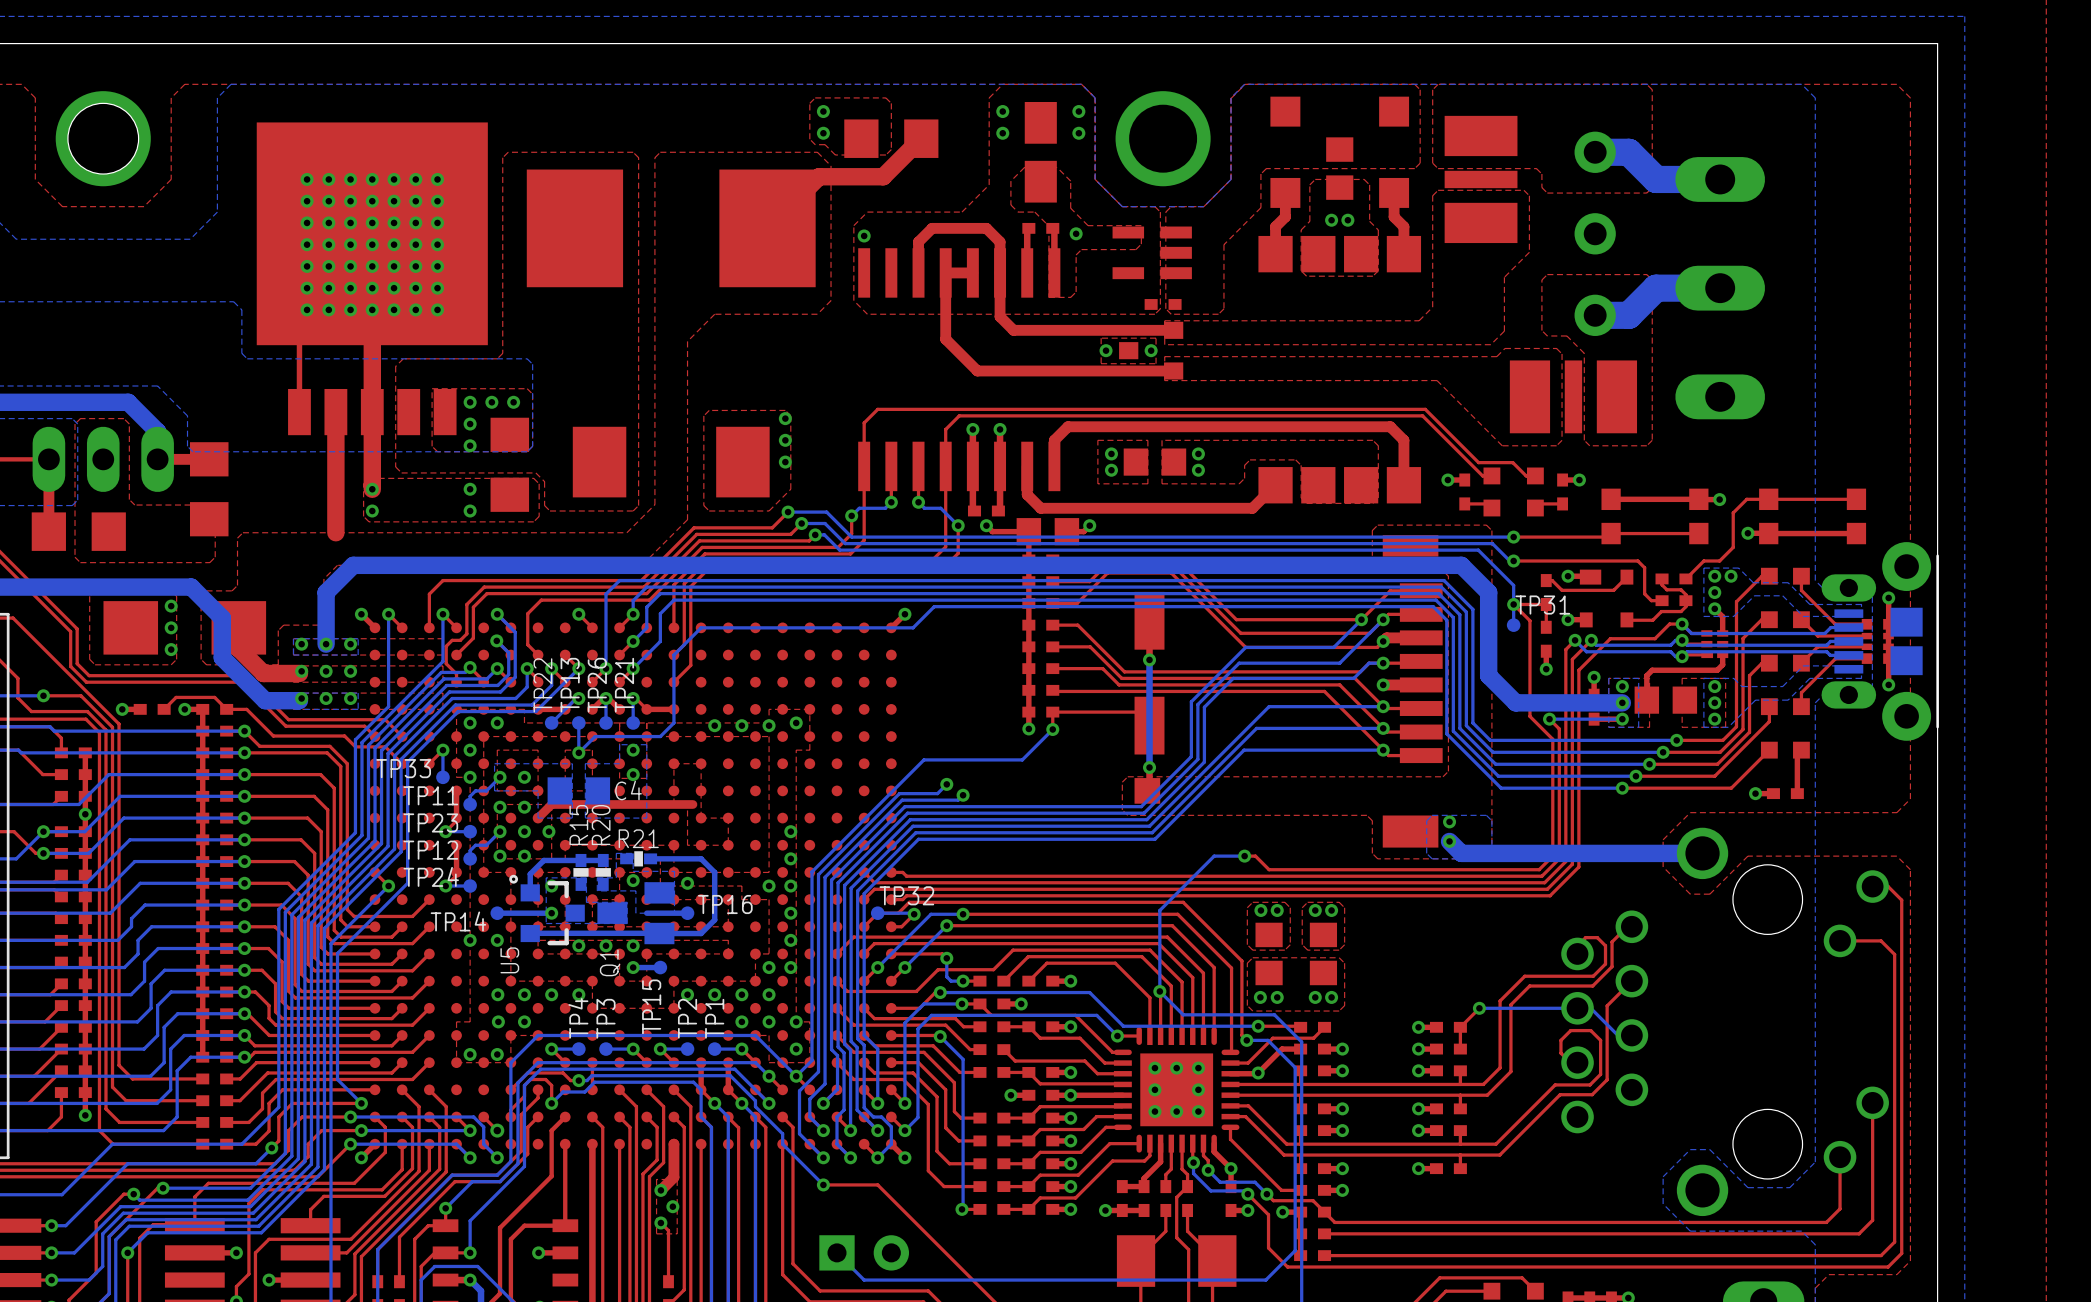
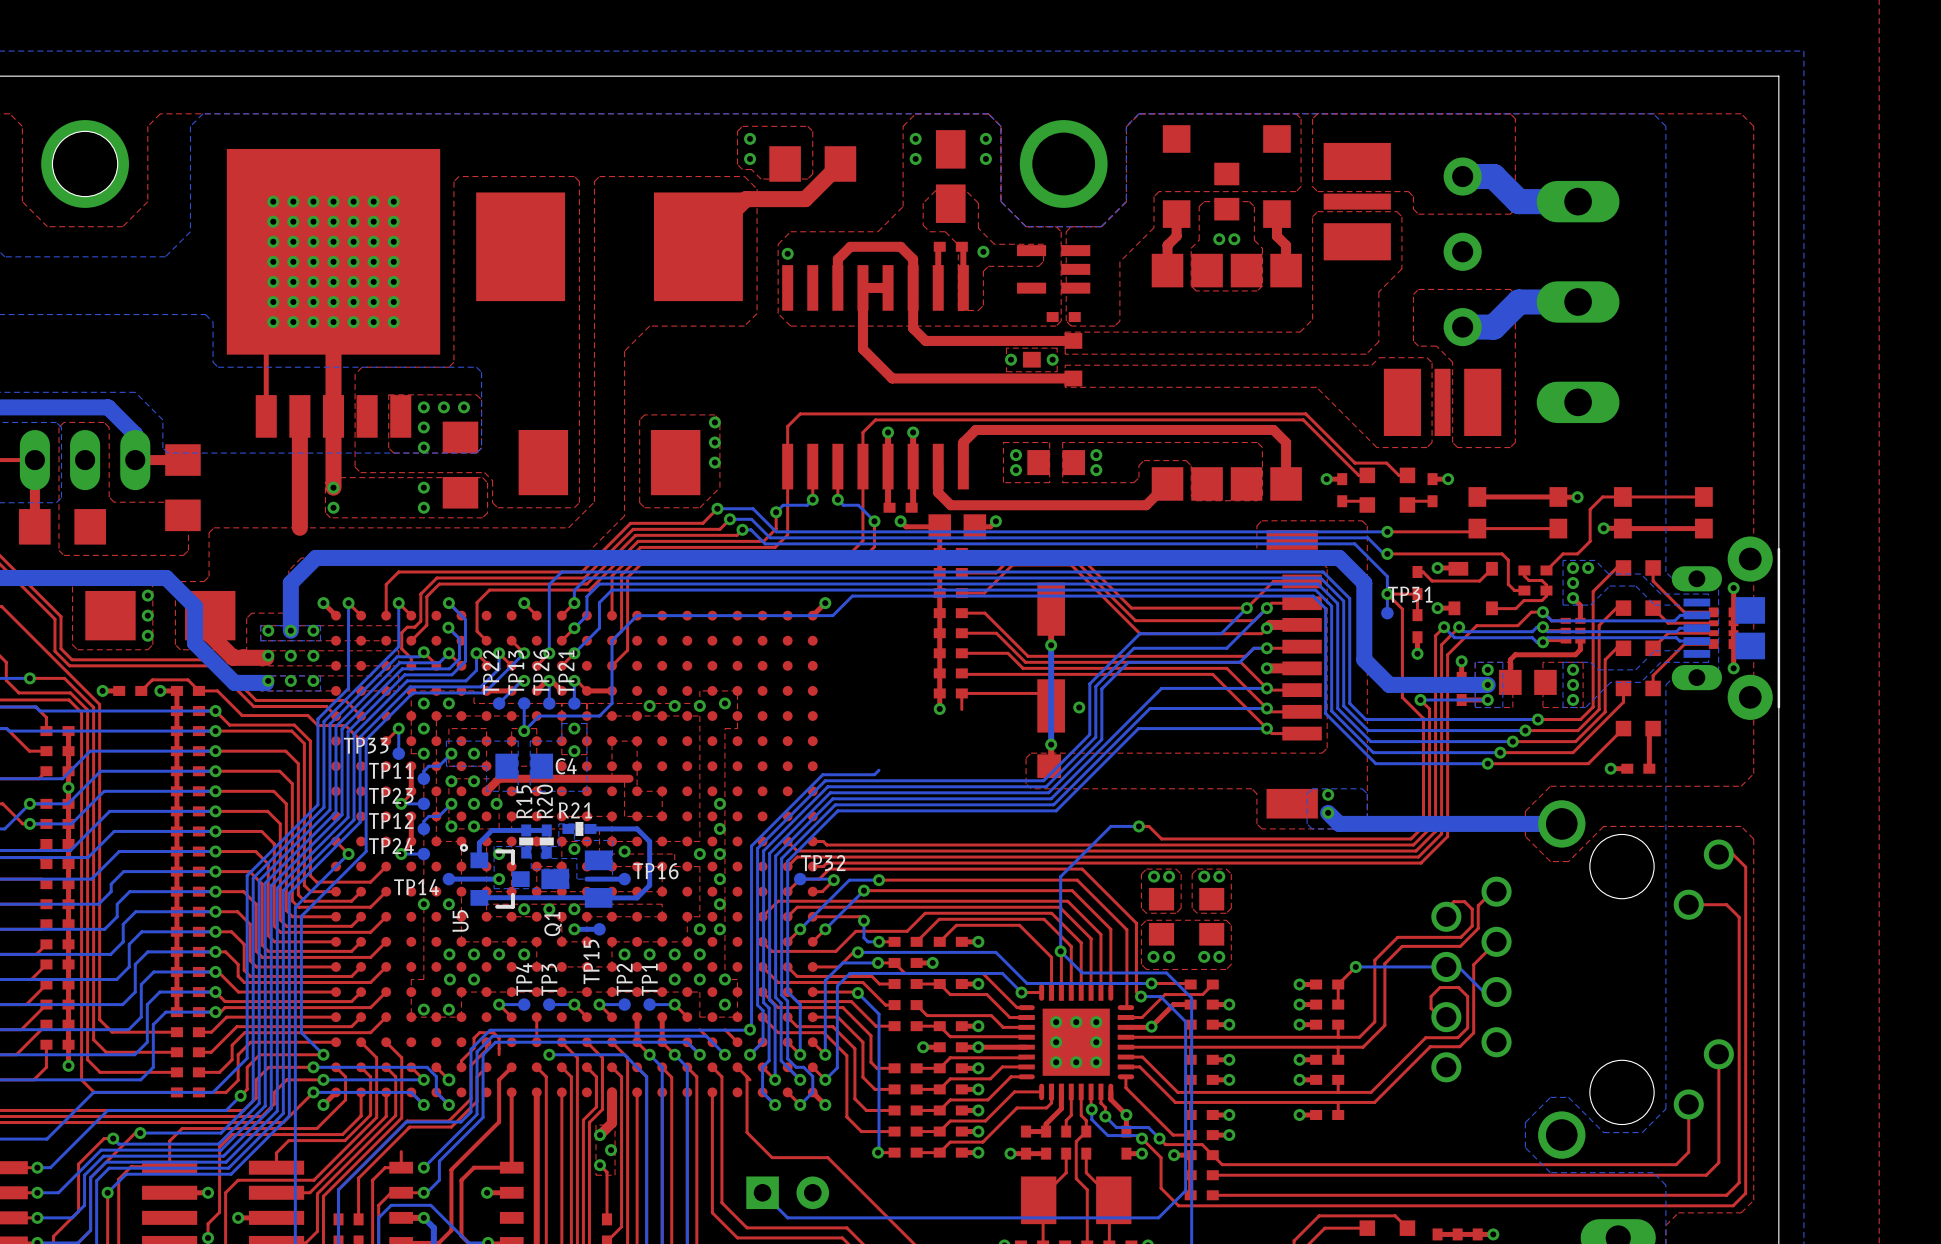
via: none -> (1079, 707)
bottom track: (1052, 729) (1022, 759) (923, 759) (811, 871) (811, 1060) (796, 1076) (755, 1035) (538, 1035) (510, 1062) (510, 1161) (497, 1175) (451, 1176) -> none
via: (1052, 729) -> none
bottom track: (946, 784) (937, 793) (899, 793) (818, 874) (818, 1071) (799, 1090) (799, 1133) (823, 1157) -> none
via: (946, 784) -> none
via: (963, 795) -> none
bottom track: (825, 1074) (825, 1083) (809, 1099) (809, 1117) (823, 1130) -> (751, 1028) (749, 1030) (490, 1030) (471, 1049) (471, 1111) (460, 1122) (406, 1122)
bottom track: (769, 1076) (755, 1062) (538, 1062) (517, 1082) (517, 1163) (500, 1181) (472, 1181) (445, 1208) -> none
via: (769, 1076) -> none
via: (796, 1076) -> none
via: none -> (750, 1029)
top track: (578, 1080) (570, 1080) (563, 1072) (527, 1072) (510, 1089) -> none
bottom track: (578, 1080) (586, 1080) (591, 1075) (730, 1075) (755, 1100) (755, 1106) (782, 1133) (782, 1144) (823, 1184) -> none
via: (578, 1080) -> none
bottom track: (755, 1089) (734, 1069) (540, 1069) (524, 1085) (524, 1166) (470, 1220) (470, 1252) -> (687, 1042) (495, 1042) (483, 1054) (483, 1117) (439, 1161) (439, 1180) (426, 1192) (423, 1192)
bottom track: (551, 1103) (563, 1092) (584, 1092) (594, 1082) (693, 1082) (701, 1089) (701, 1117) -> (549, 1054) (624, 1054) (637, 1067)
via: (551, 1103) -> none
via: none -> (549, 1054)
bottom track: none -> (724, 1054) (706, 1036) (492, 1036) (477, 1051) (477, 1114) (423, 1167)
via: none -> (724, 1054)
via: (823, 1130) -> none
via: (823, 1157) -> none
top track: (823, 1184) (877, 1184) (907, 1214) -> (747, 1076) (747, 1132) (772, 1157) (827, 1157)
via: (823, 1184) -> none
via position: (445, 1208) -> (423, 1167)

